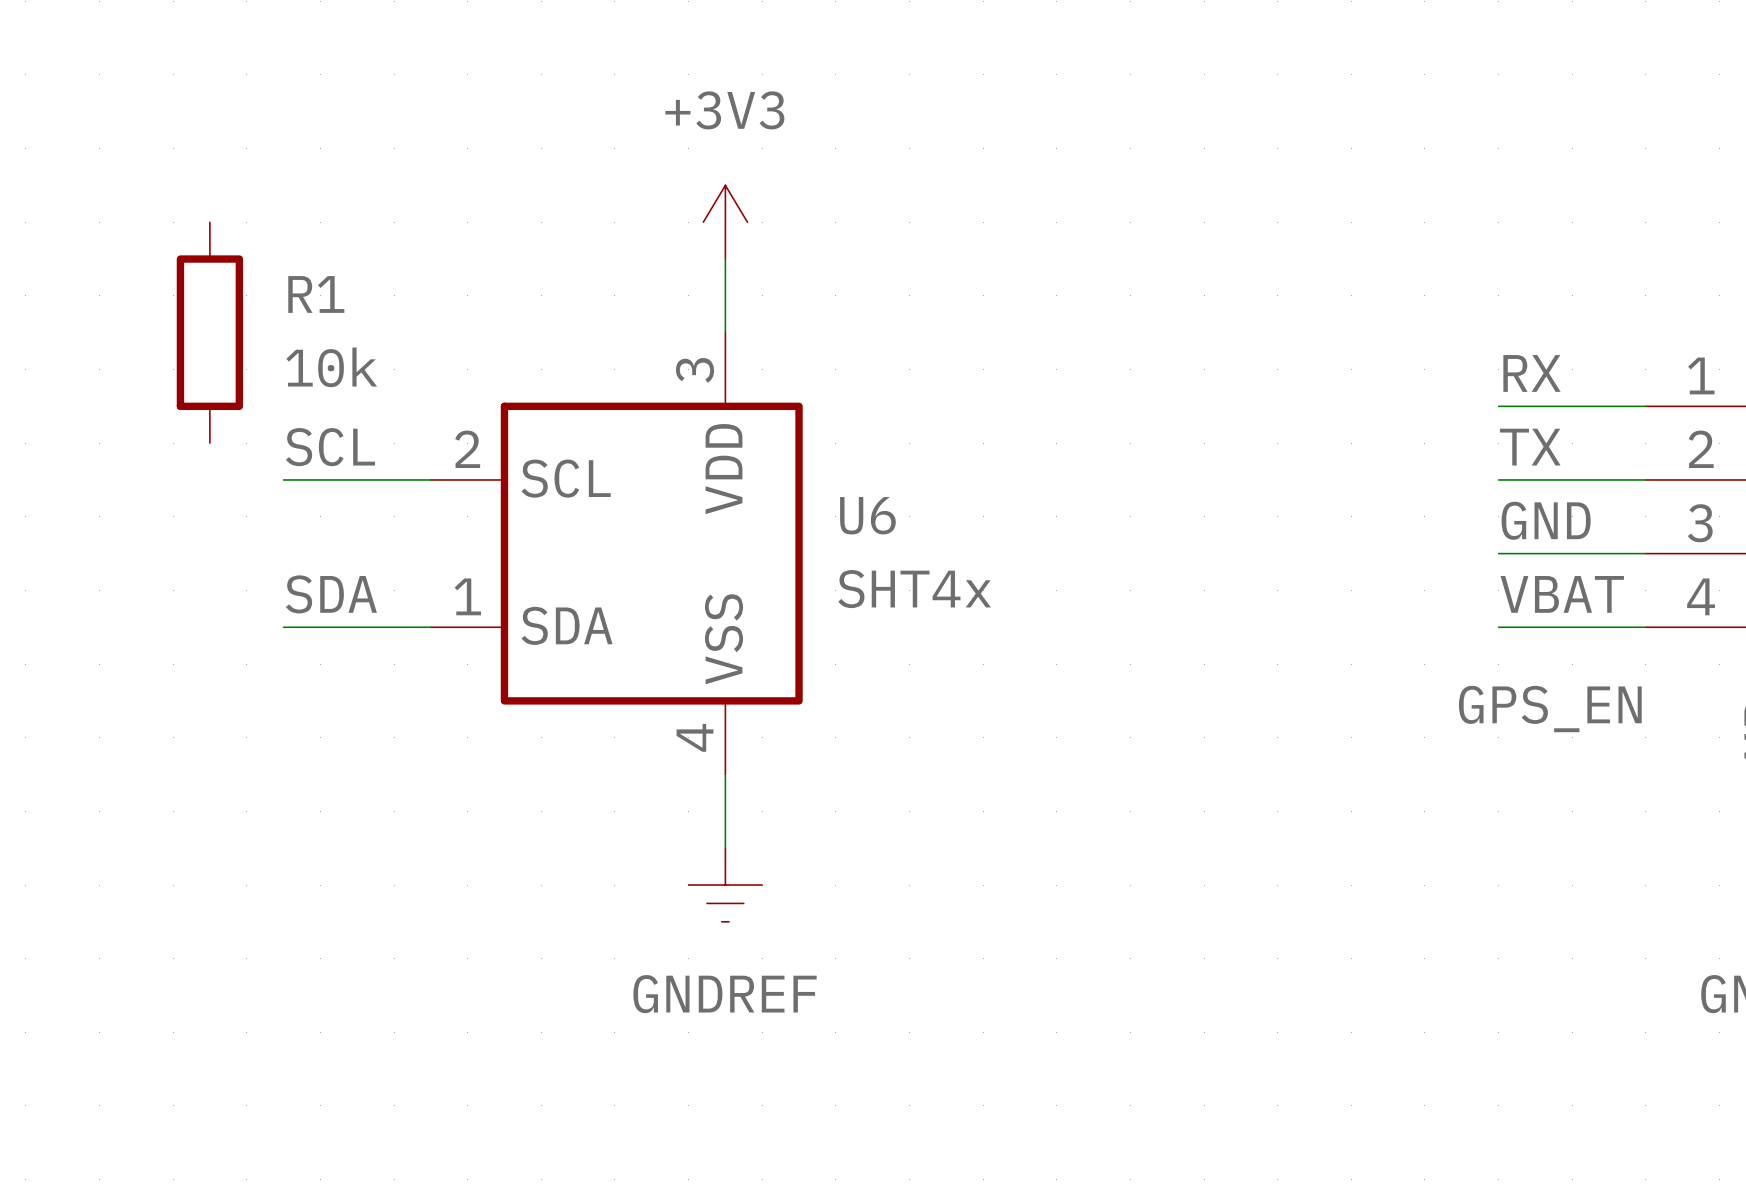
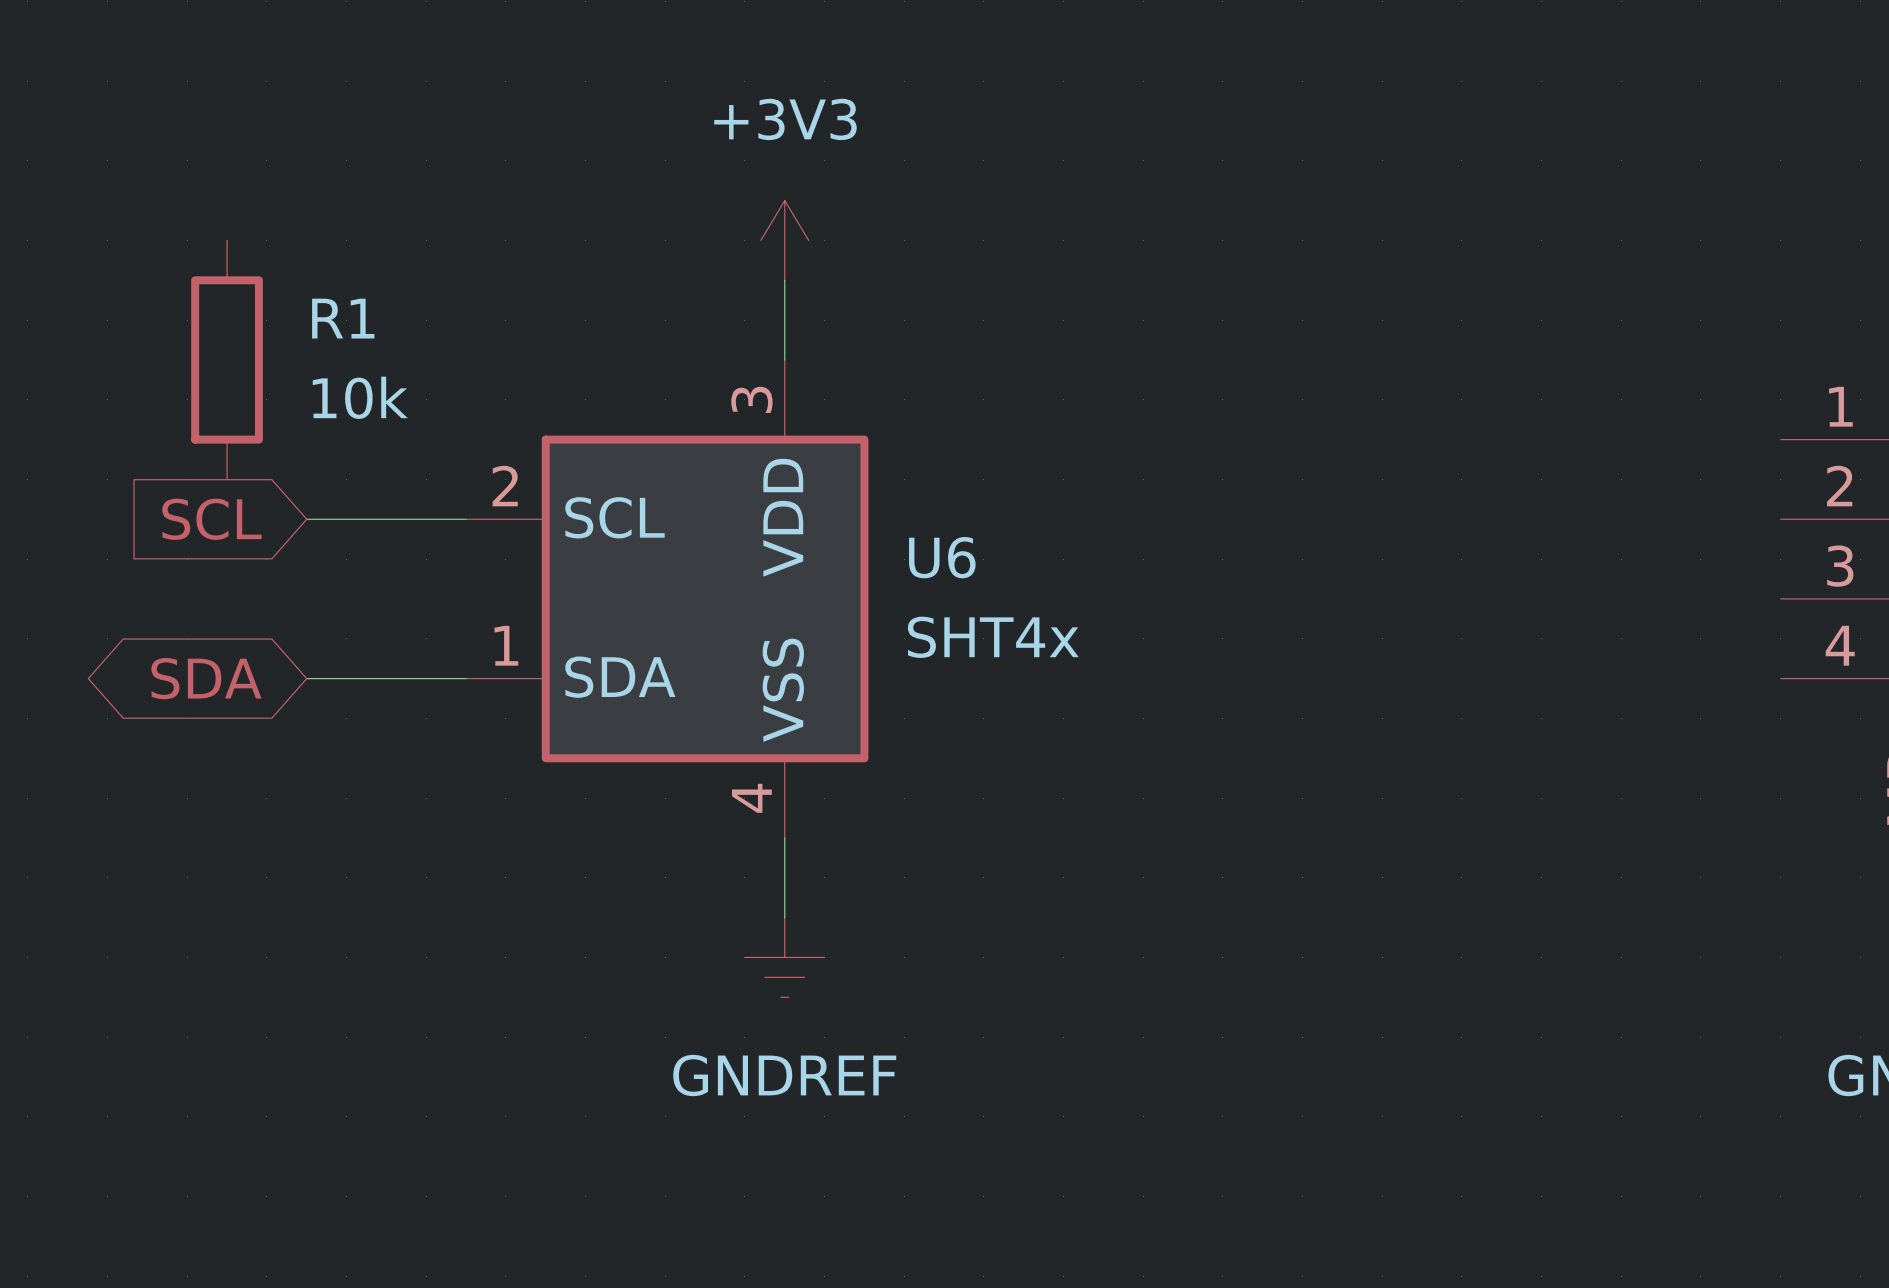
label: RX (1532, 373) -> none
wire: (1498, 406) (1645, 406) -> none
label: SCL (330, 447) -> none
label: TX (1530, 447) -> none
global label: none -> SCL (211, 519)
wire: (1498, 479) (1645, 479) -> none
label: GND (1546, 520) -> none
wire: (1498, 553) (1645, 553) -> none
label: SDA (331, 594) -> none
label: VBAT (1562, 594) -> none
global label: none -> SDA (206, 678)
wire: (1498, 627) (1645, 627) -> none
label: GPS_EN (1550, 709) -> none

